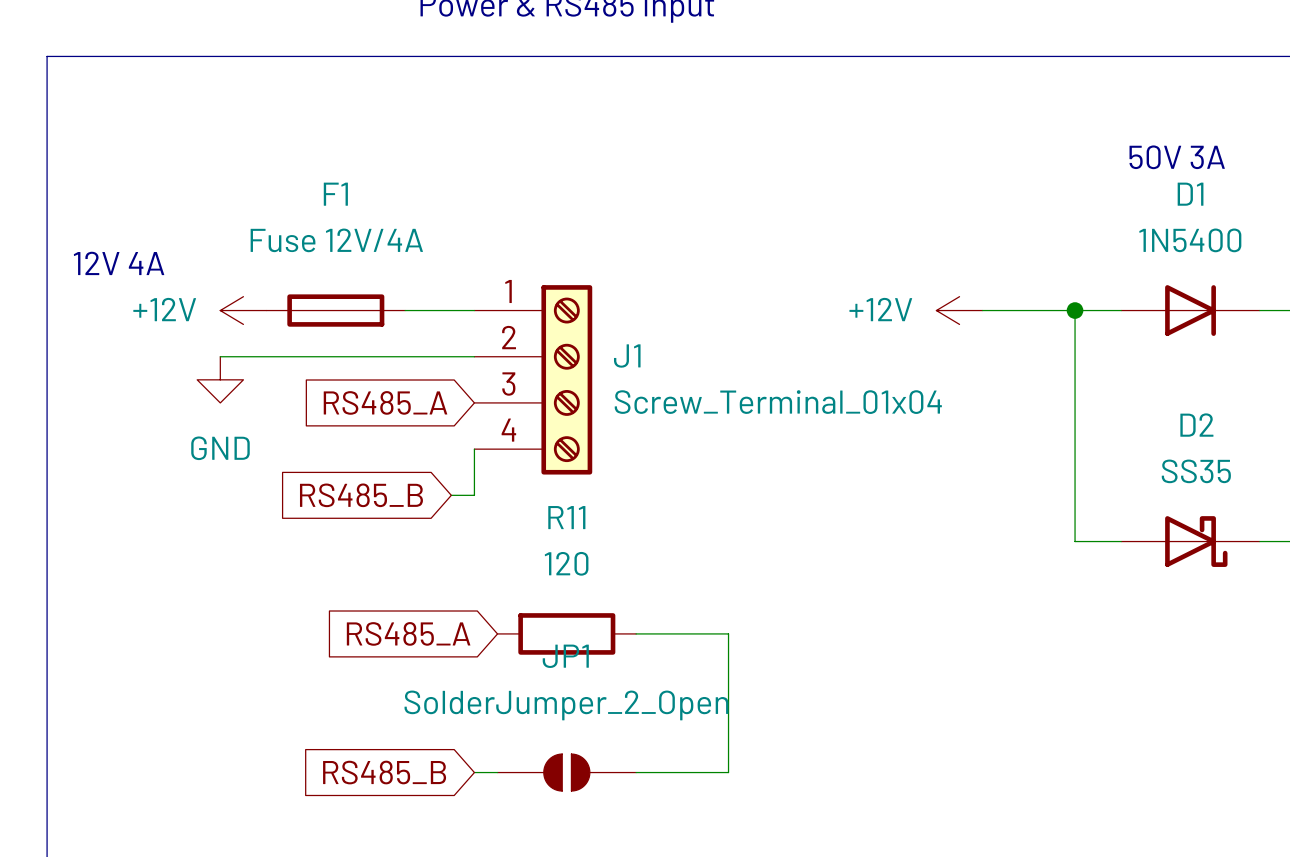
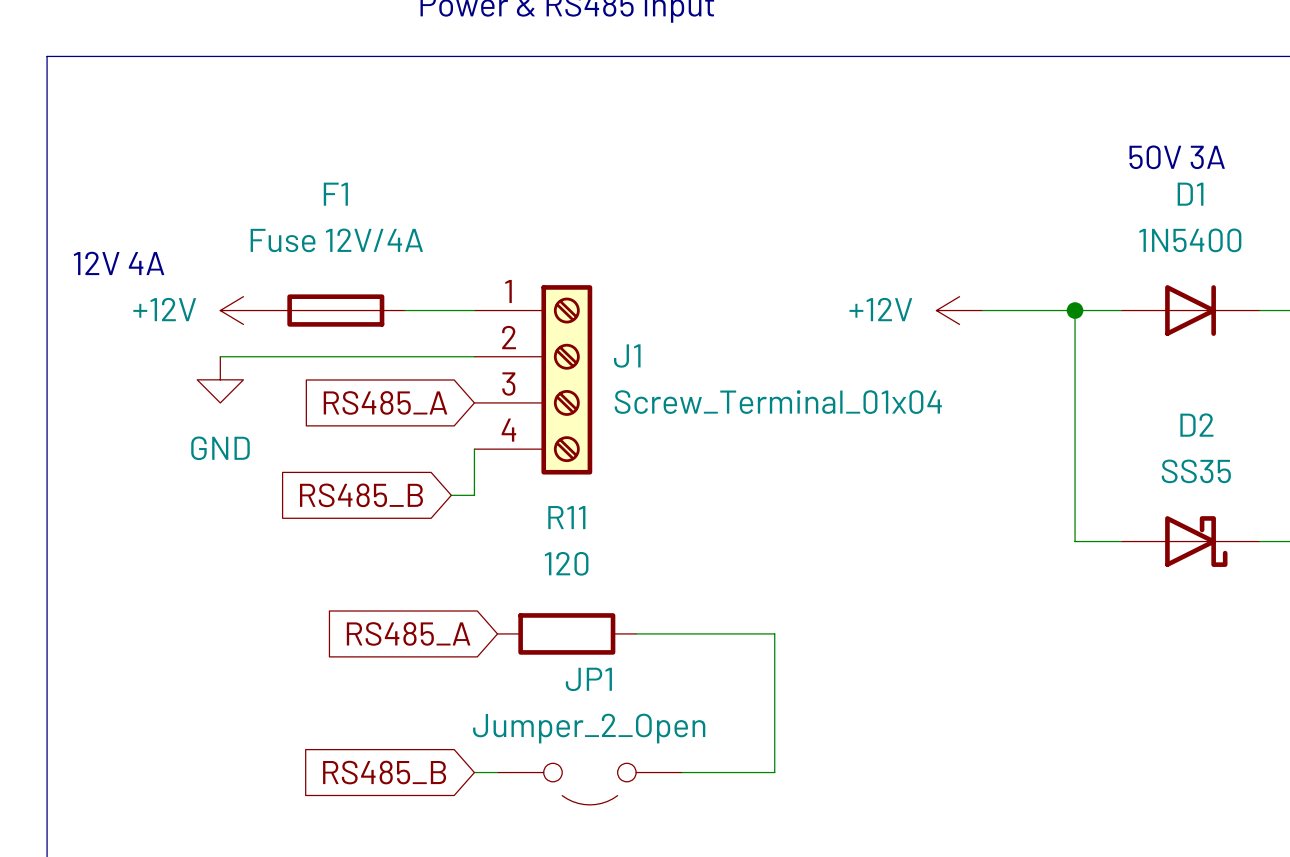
wire: (728, 633) (728, 772) -> (728, 633) (774, 633) (774, 772) (728, 772)
JP1 value: SolderJumper_2_Open (566, 705) -> Jumper_2_Open (589, 728)
JP1 symbol: [497, 754, 637, 792] -> [497, 763, 683, 805]

